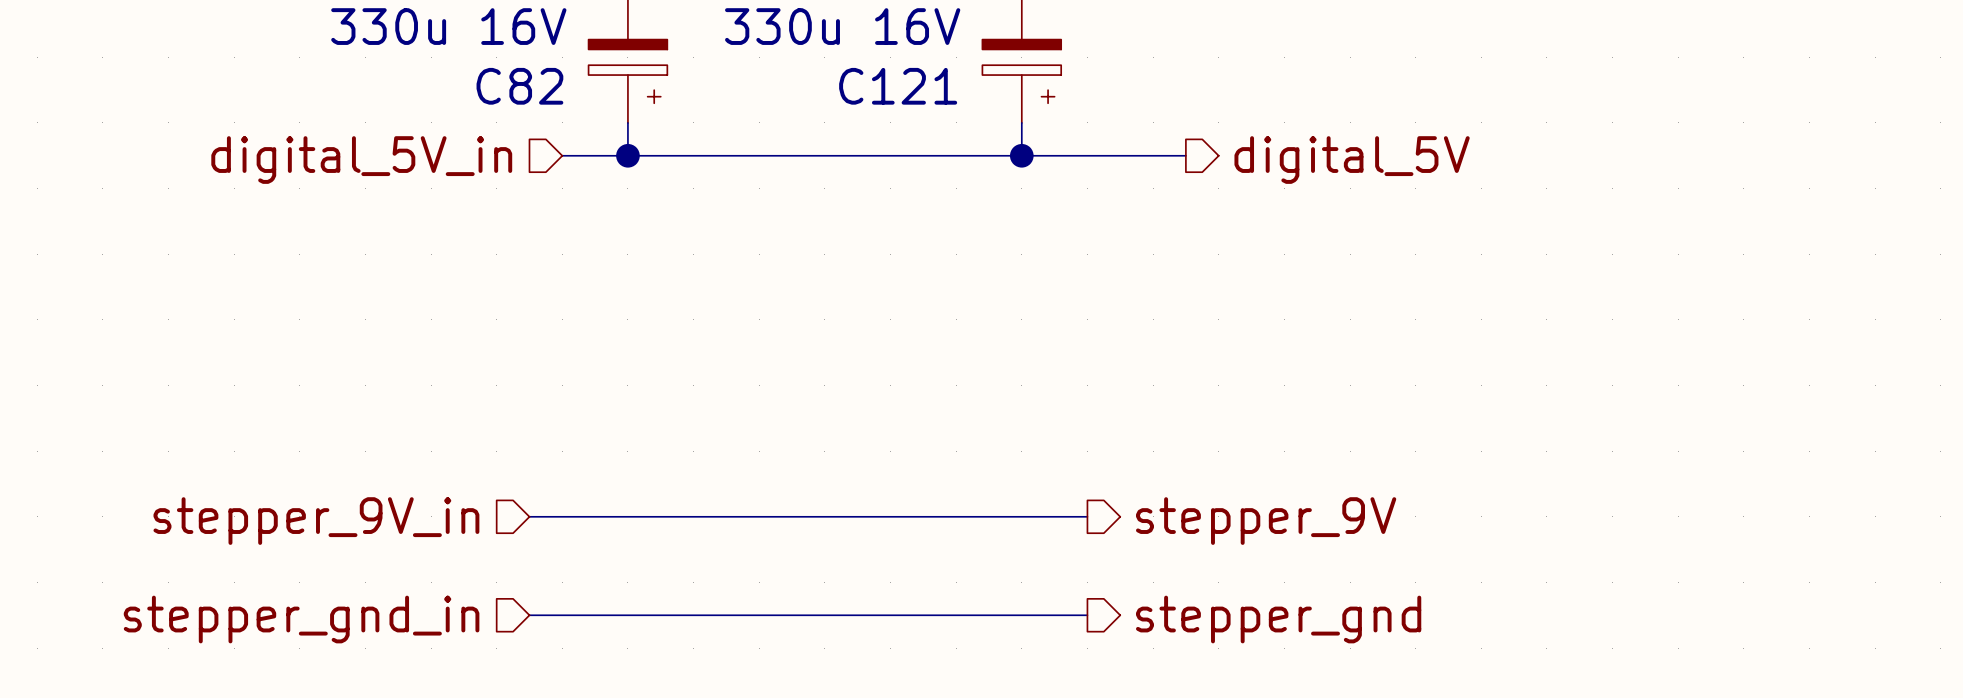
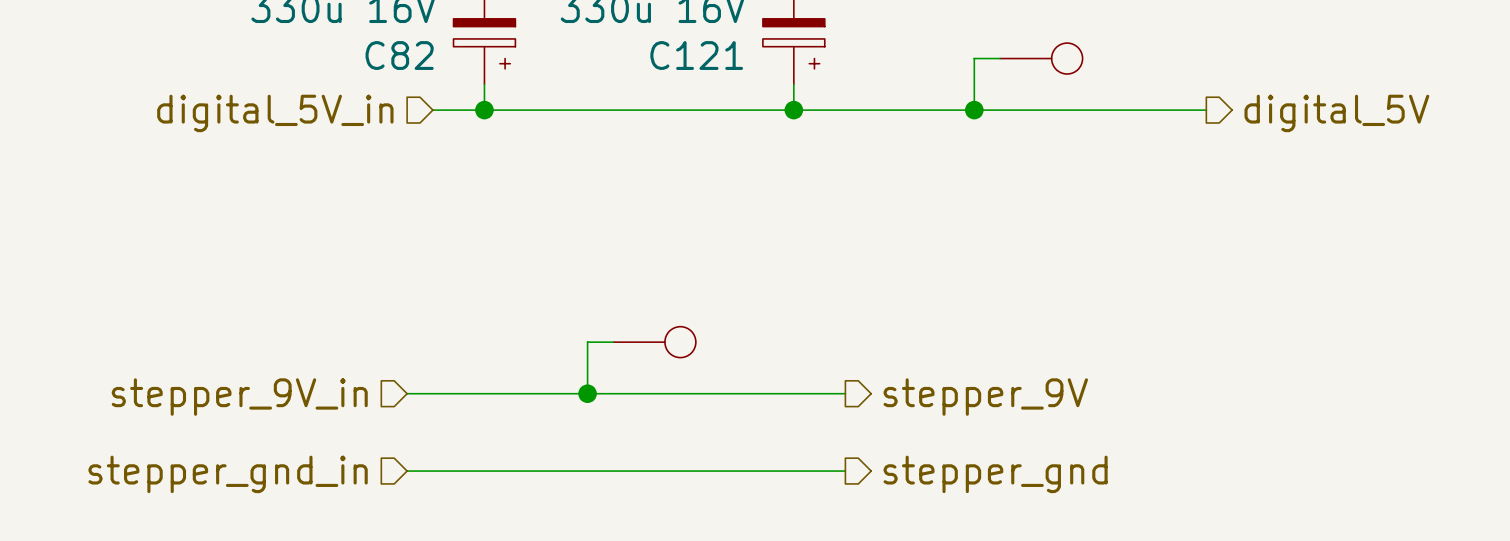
wire: none -> (1000, 58) (974, 58) (974, 110)
part: none -> (1041, 58)
wire: none -> (922, 110) (1206, 110)
junction: none -> (974, 110)
hierarchical label position: digital_5V (1352, 160) -> digital_5V (1336, 113)
wire: none -> (613, 342) (587, 342) (587, 393)
part: none -> (654, 342)
junction: none -> (587, 393)

